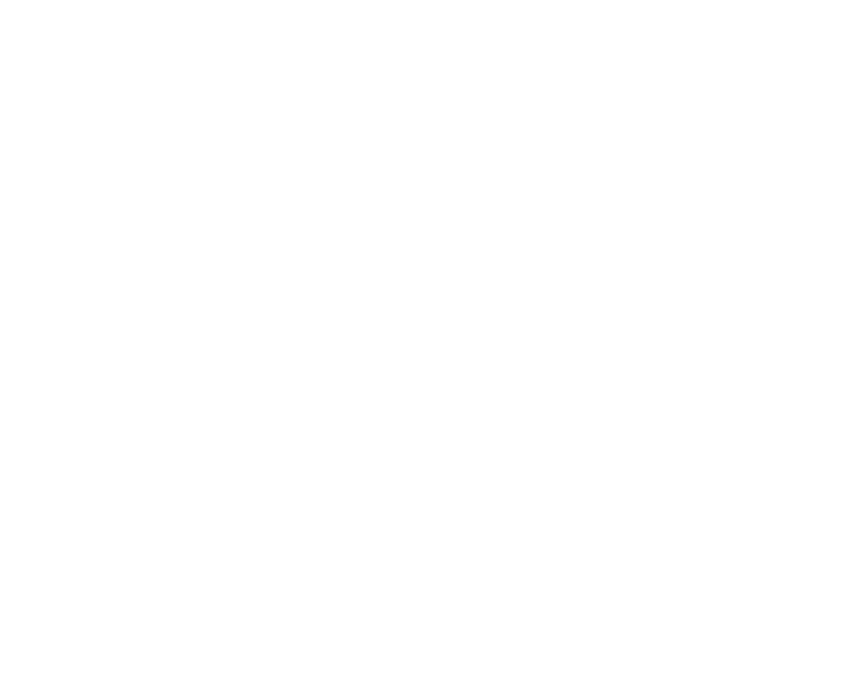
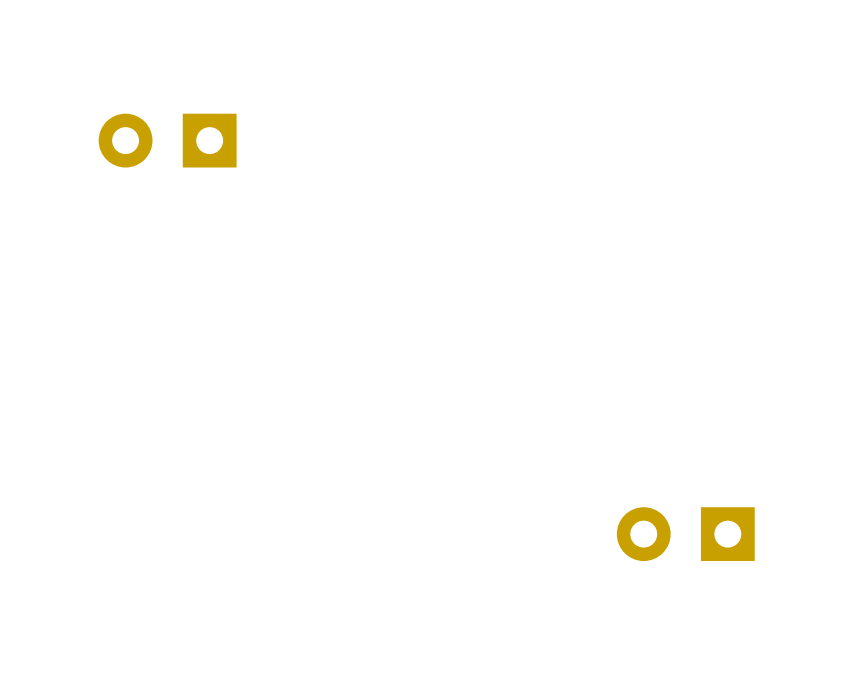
part: none -> (167, 140)
part: none -> (685, 534)

